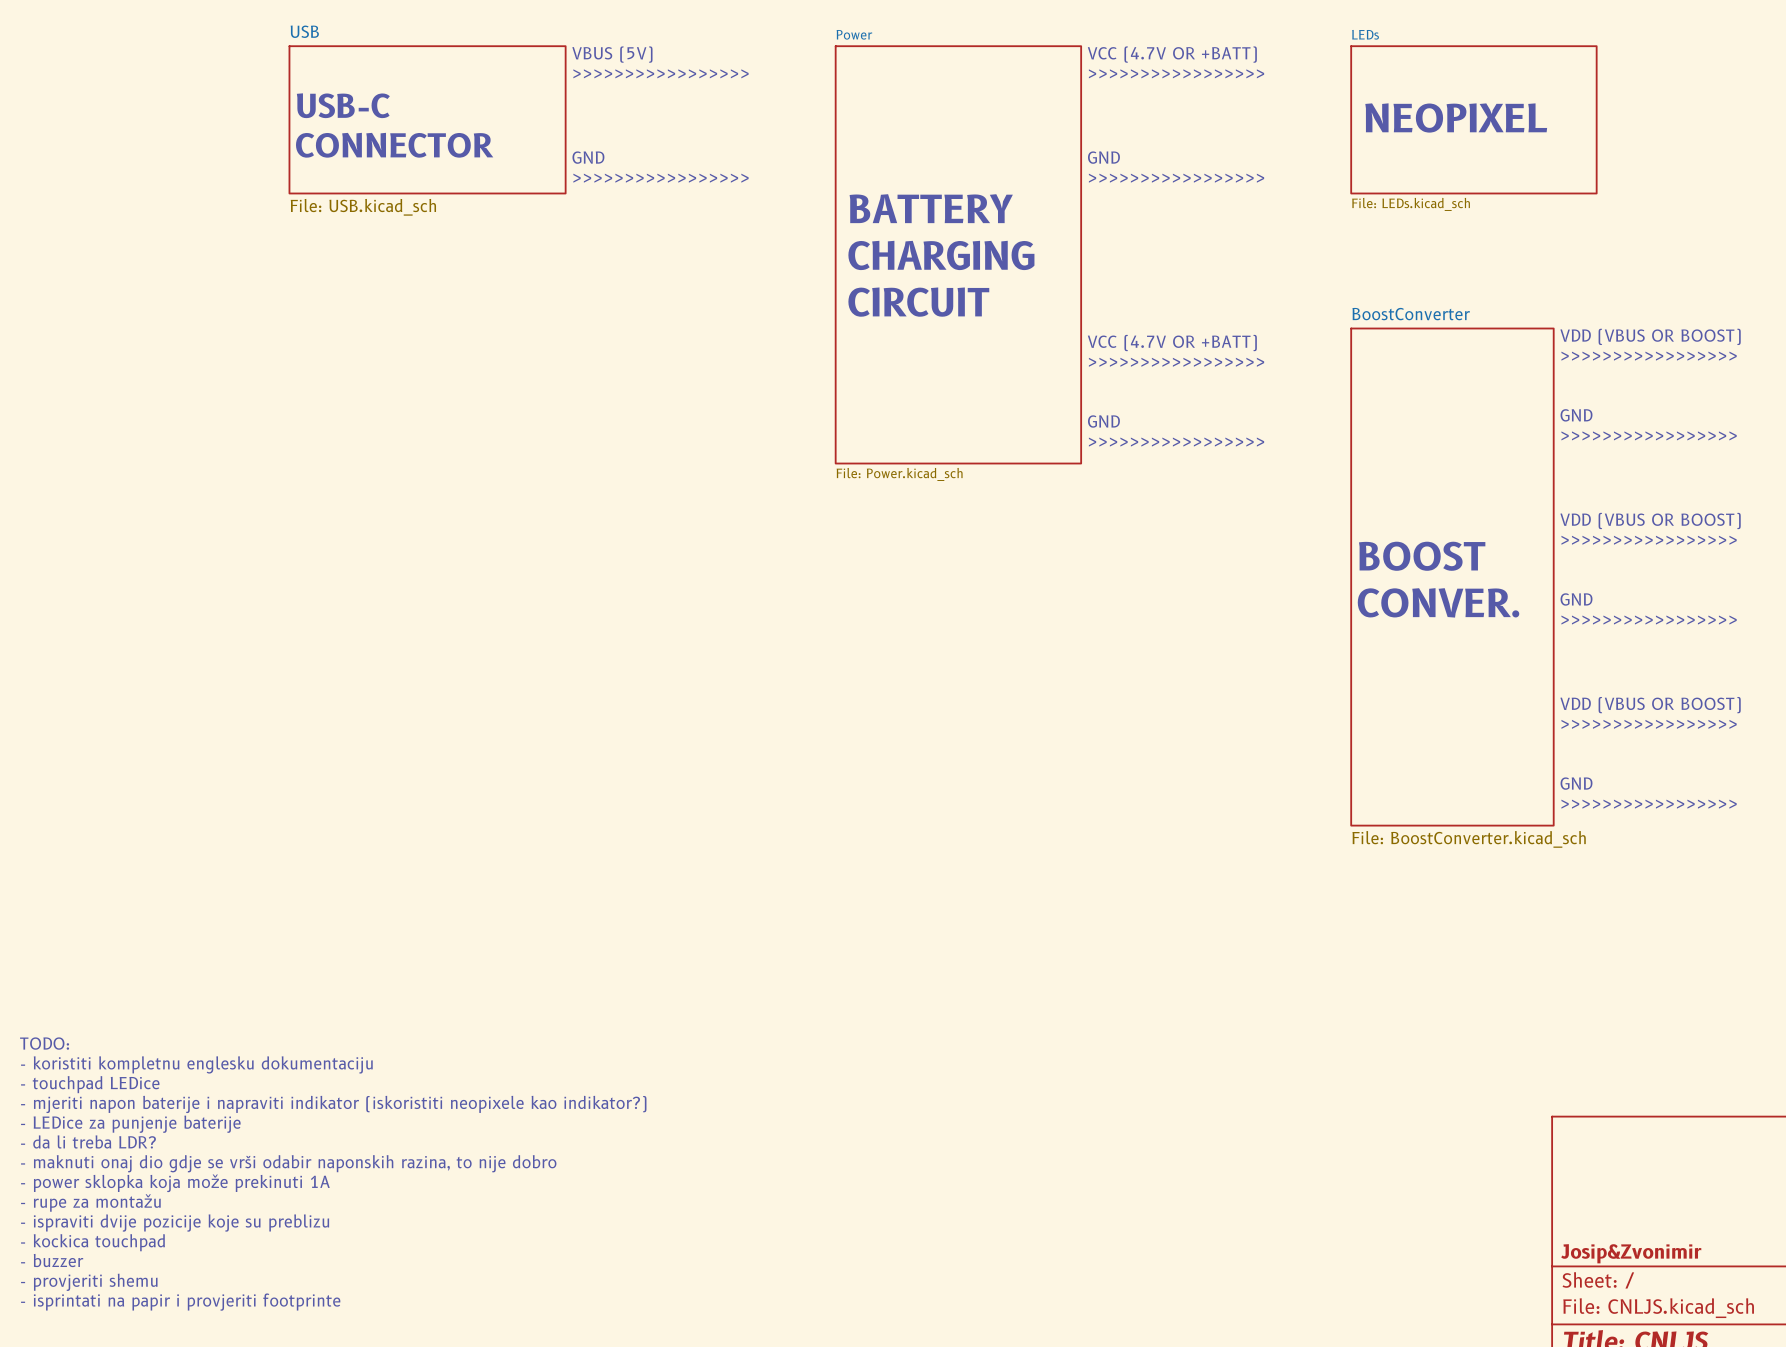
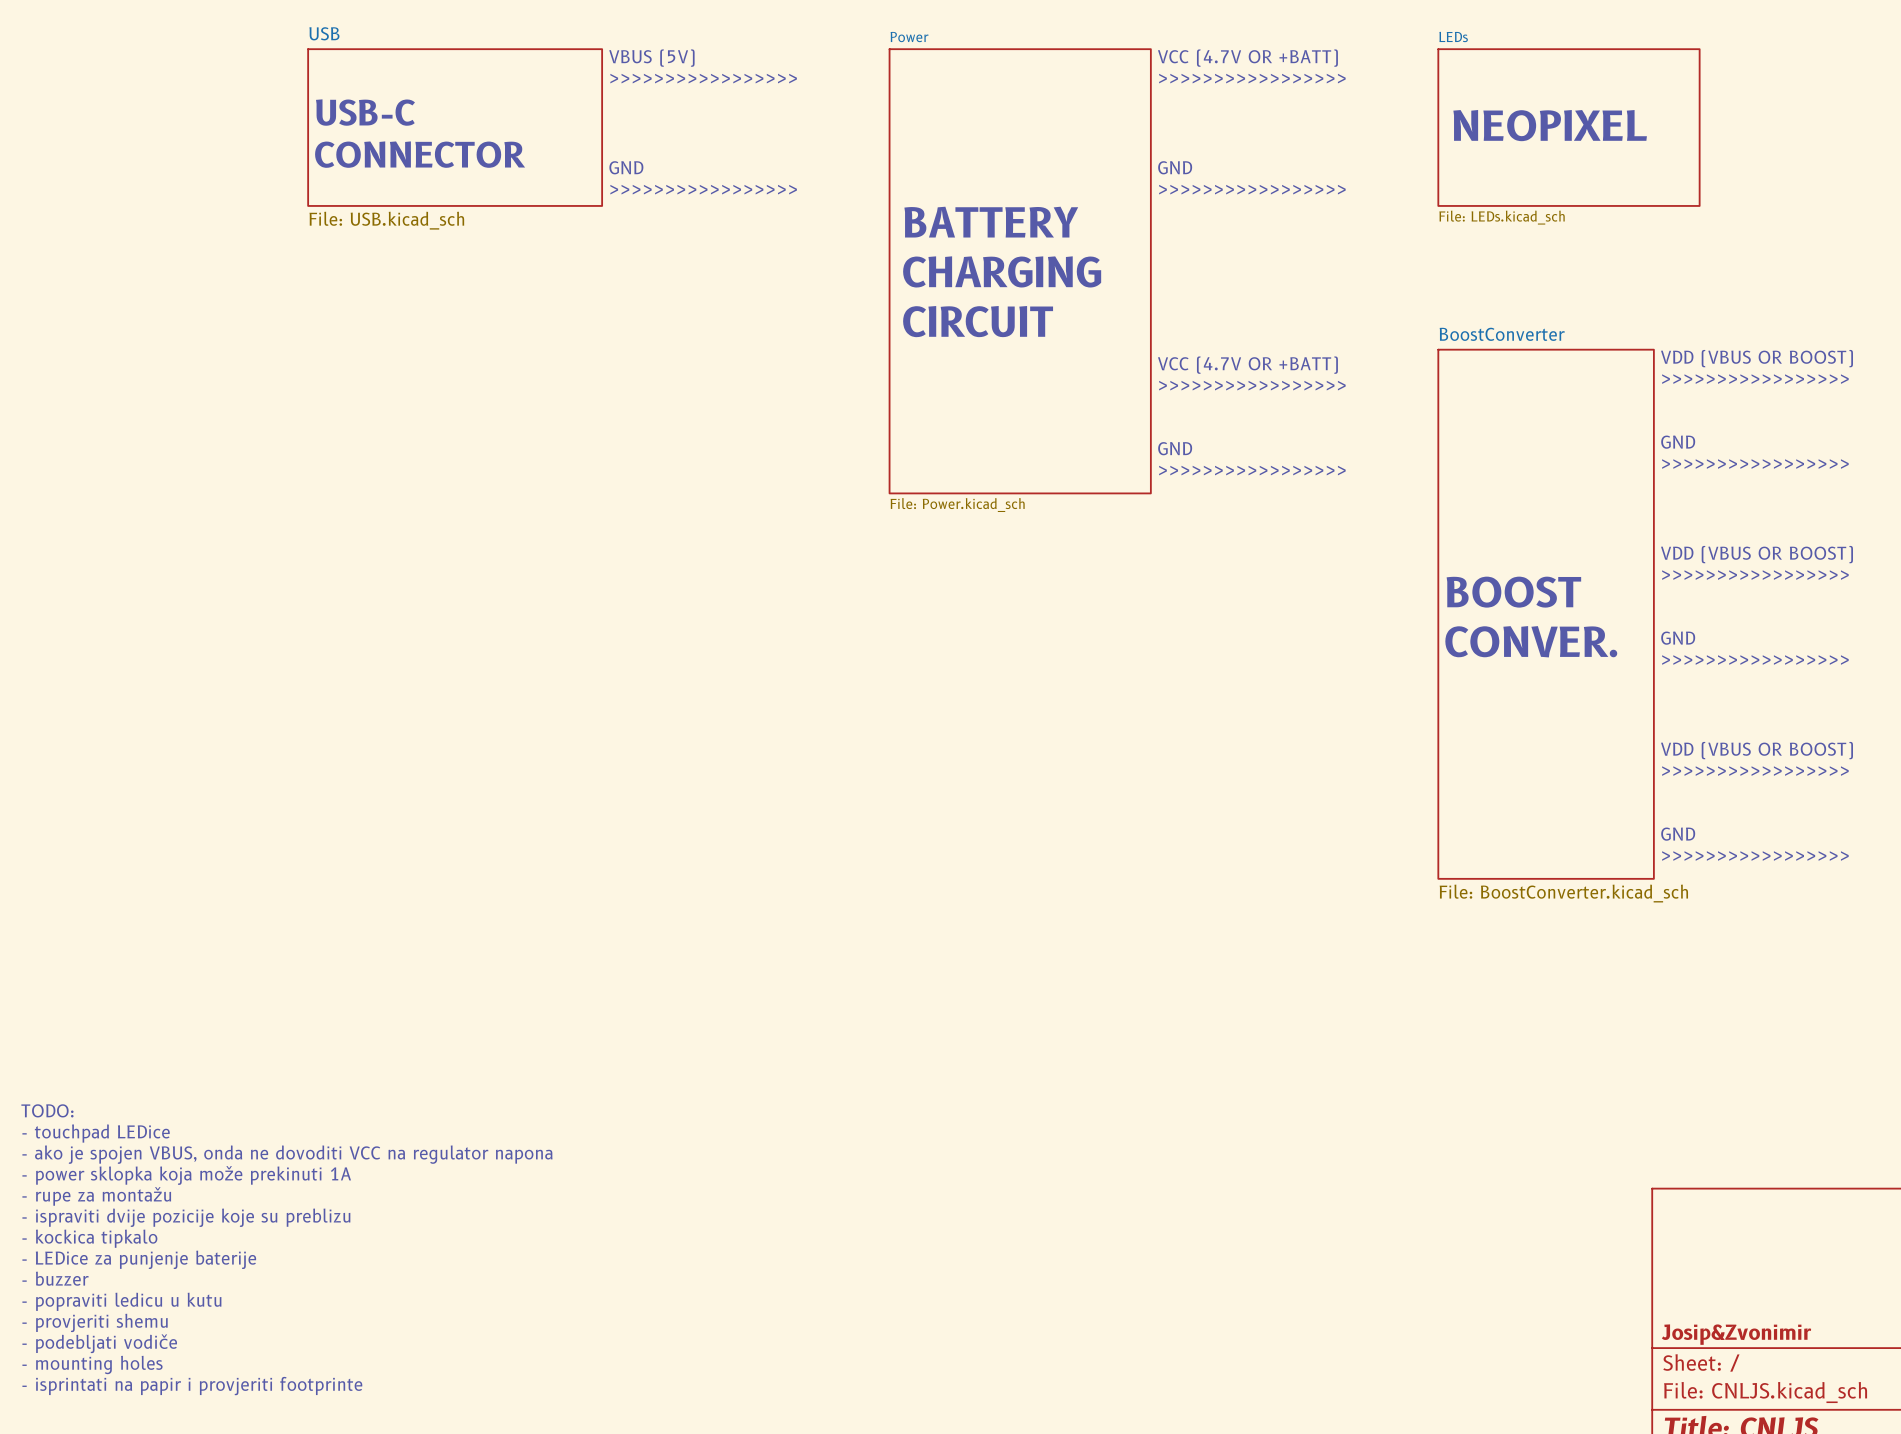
text: - koristiti kompletnu englesku dokumentaciju (196, 1064) -> - touchpad LEDice (96, 1133)
text: - touchpad LEDice (90, 1084) -> - ako je spojen VBUS, onda ne dovoditi VCC na regulator napona (287, 1154)
text: - mjeriti napon baterije i napraviti indikator (iskoristiti neopixele kao indikator?) (333, 1104) -> - power sklopka koja može prekinuti 1A (186, 1175)
text: - LEDice za punjenje baterije (130, 1124) -> - rupe za montažu (96, 1196)
text: - da li treba LDR? (88, 1141) -> - ispraviti dvije pozicije koje su preblizu (186, 1217)
text: - maknuti onaj dio gdje se vrši odabir naponskih razina, to nije dobro (288, 1163) -> - kockica tipkalo (89, 1238)
text: - power sklopka koja može prekinuti 1A (175, 1183) -> - LEDice za punjenje baterije (139, 1259)
text: - rupe za montažu (90, 1202) -> - buzzer (55, 1278)
text: - ispraviti dvije pozicije koje su preblizu (175, 1223) -> - popraviti ledicu u kutu (121, 1301)
text: - kockica touchpad (93, 1242) -> - provjeriti shemu (95, 1322)
text: - buzzer (52, 1260) -> - podebljati vodiče (99, 1343)
text: - provjeriti shemu (89, 1282) -> - mounting holes (92, 1365)

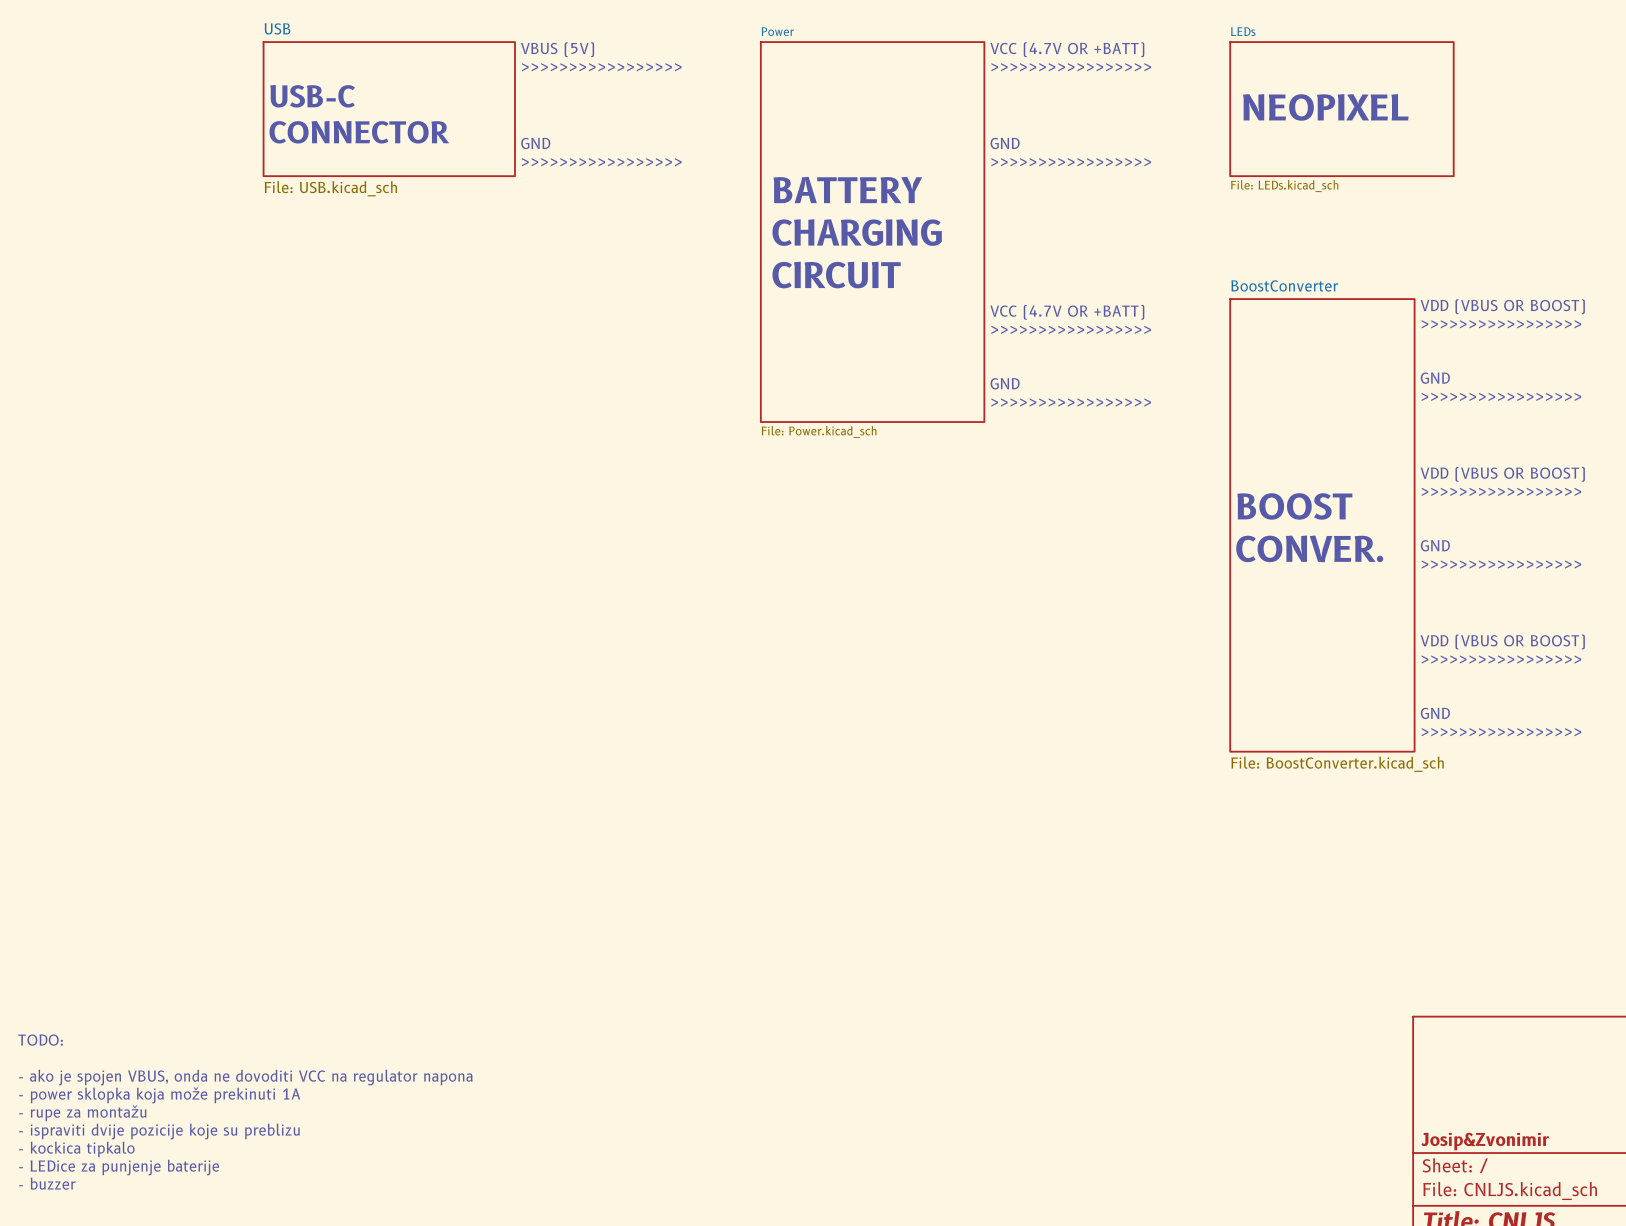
text: TODO: (47, 1110) -> none
text: - touchpad LEDice (96, 1133) -> none
text: - ako je spojen VBUS, onda ne dovoditi VCC na regulator napona (287, 1154) -> none
text: - power sklopka koja može prekinuti 1A (186, 1175) -> none
text: - rupe za montažu (96, 1196) -> none
text: - ispraviti dvije pozicije koje su preblizu (186, 1217) -> TODO: (40, 1040)
text: - kockica tipkalo (89, 1238) -> none
text: - LEDice za punjenje baterije (139, 1259) -> - ako je spojen VBUS, onda ne dovoditi VCC na regulator napona (245, 1077)
text: - buzzer (55, 1278) -> - power sklopka koja može prekinuti 1A (159, 1095)
text: - popraviti ledicu u kutu (121, 1301) -> - rupe za montažu (82, 1113)
text: - provjeriti shemu (95, 1322) -> - ispraviti dvije pozicije koje su preblizu (159, 1131)
text: - podebljati vodiče (99, 1343) -> - kockica tipkalo (76, 1149)
text: - mounting holes (92, 1365) -> - LEDice za punjenje baterije (119, 1167)
text: - isprintati na papir i provjeriti footprinte (192, 1386) -> - buzzer (47, 1183)

